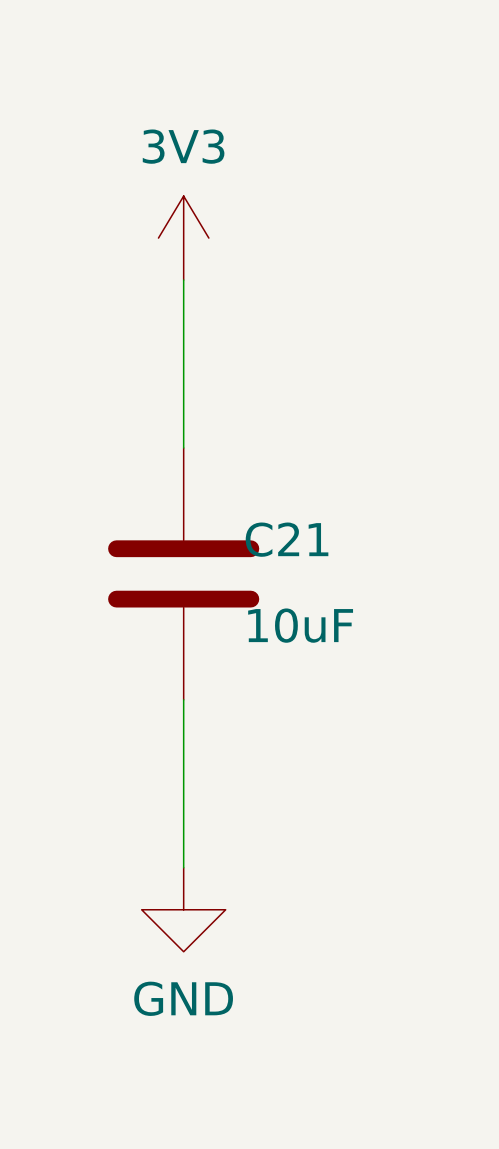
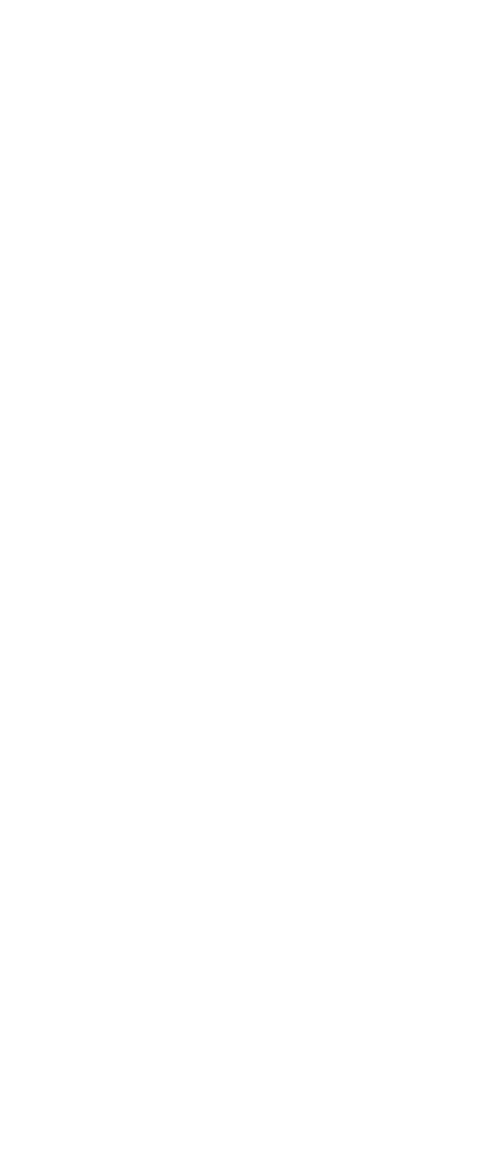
power symbol: 3V3 (183, 238) -> none
wire: (183, 280) (183, 447) -> none
C21: 10uF (183, 573) -> none
wire: (183, 699) (183, 867) -> none
power symbol: GND (183, 909) -> none

